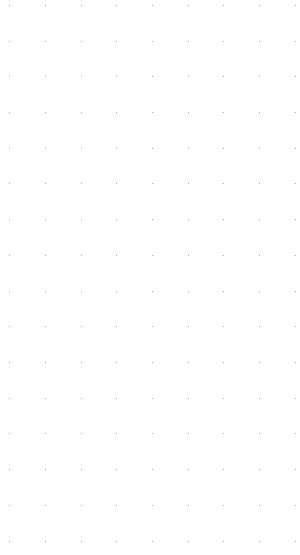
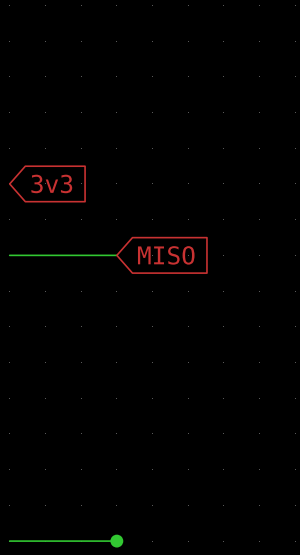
global label: none -> 3v3 (51, 183)
wire: none -> (9, 255) (116, 255)
global label: none -> MISO (166, 255)
wire: none -> (9, 541) (116, 541)
junction: none -> (116, 541)

